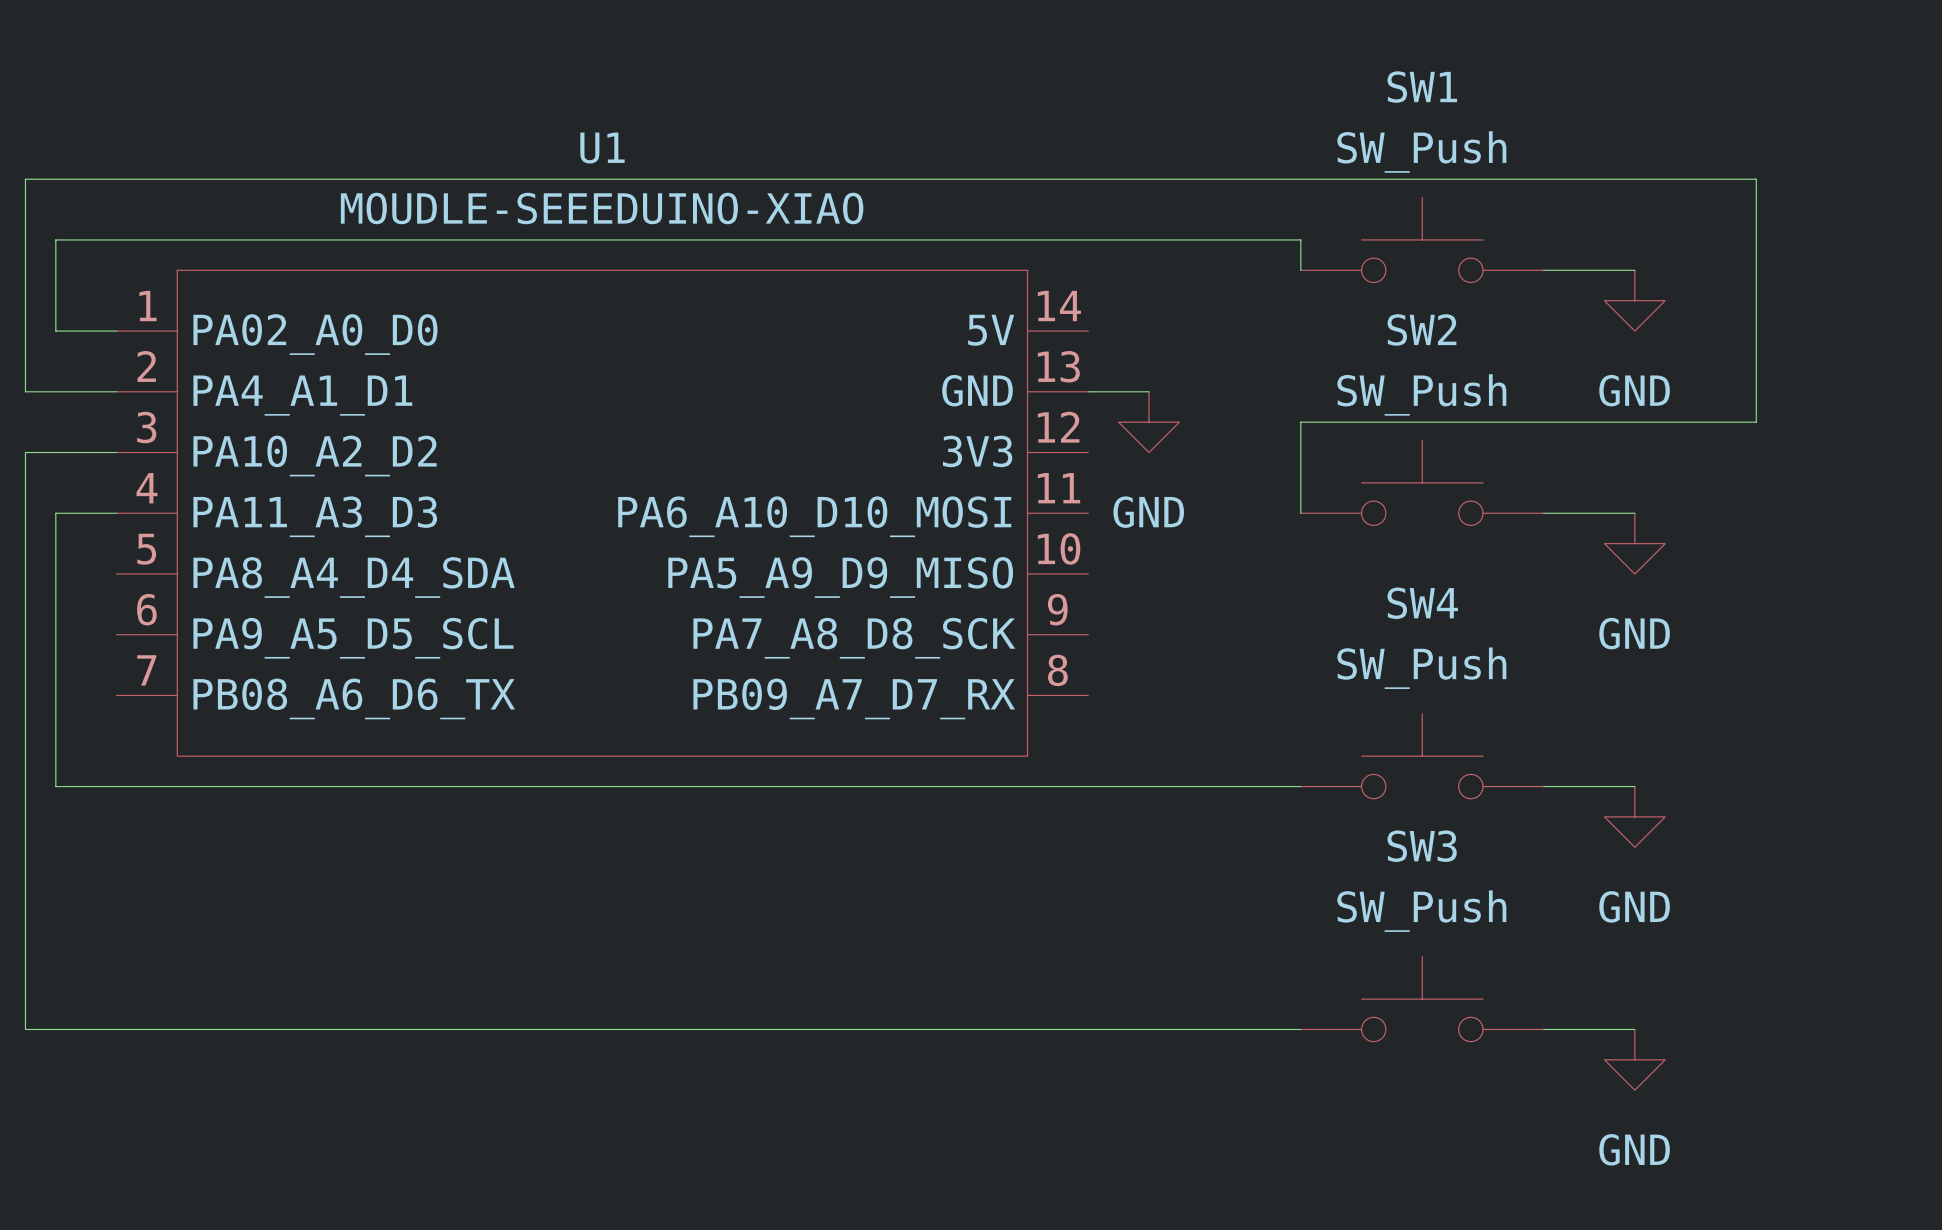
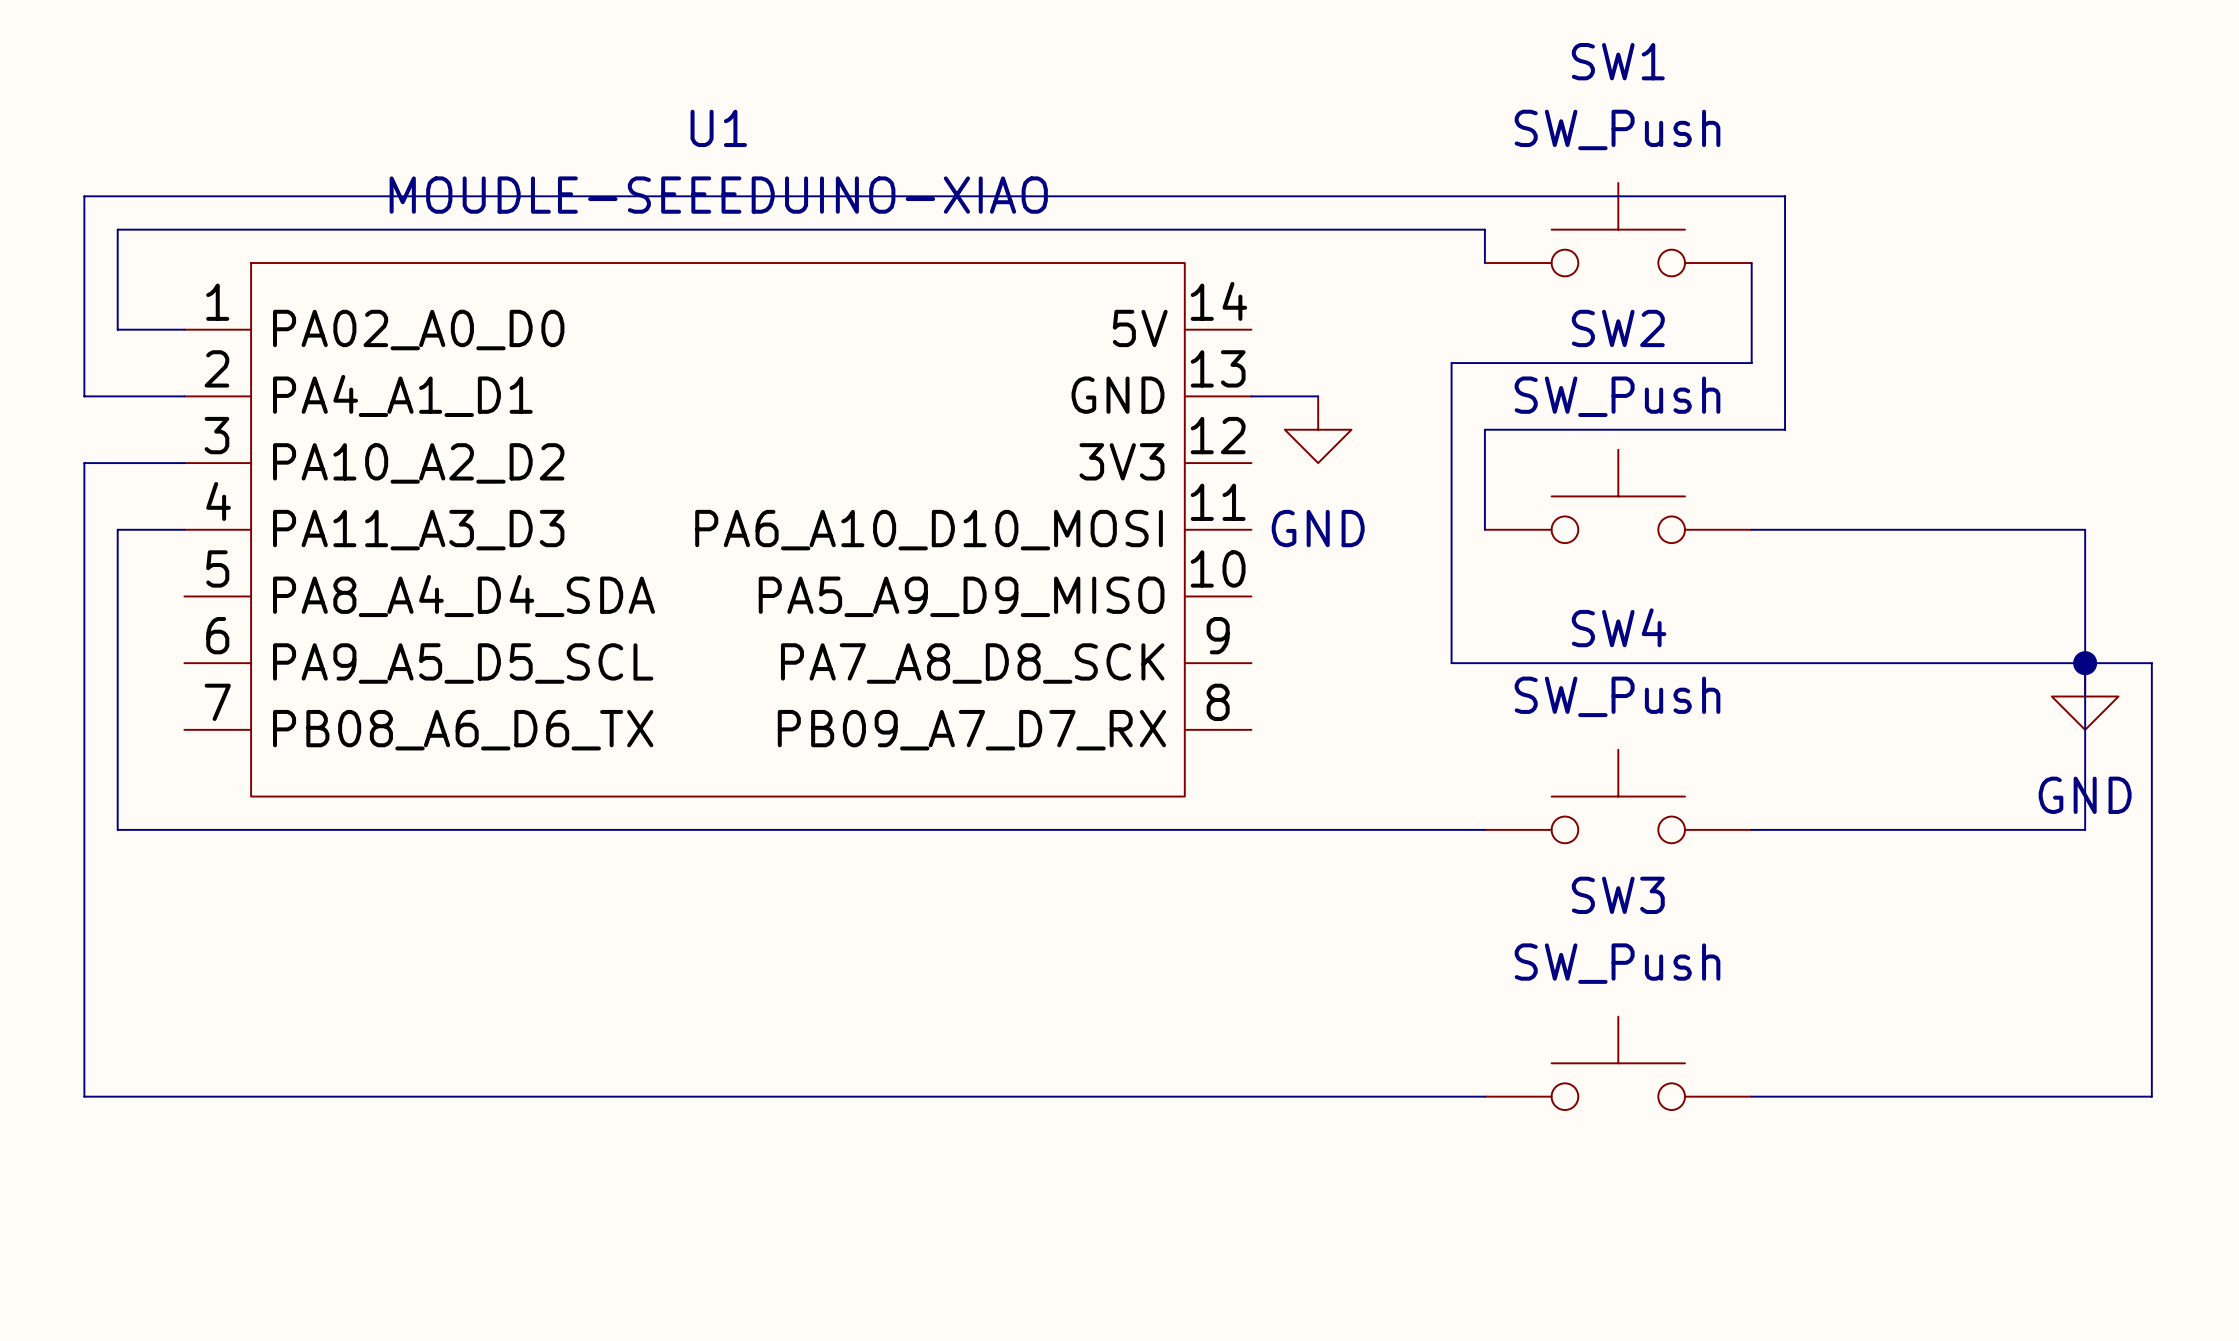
wire: (25, 209) (25, 179) (1756, 179) (1756, 422) (1574, 422) -> (84, 196) (1785, 196) (1785, 429)
wire: (1543, 270) (1634, 270) -> (1751, 263) (1751, 363) (1451, 363) (1451, 663) (2151, 663) (2151, 1096) (1851, 1096)
power symbol: GND (1634, 300) -> none
wire: none -> (1851, 529) (2085, 529) (2085, 829) (1851, 829)
power symbol: GND (1634, 543) -> none
junction: none -> (2085, 663)
power symbol: none -> GND (2085, 696)
power symbol: GND (1634, 816) -> none
power symbol: GND (1634, 1059) -> none

